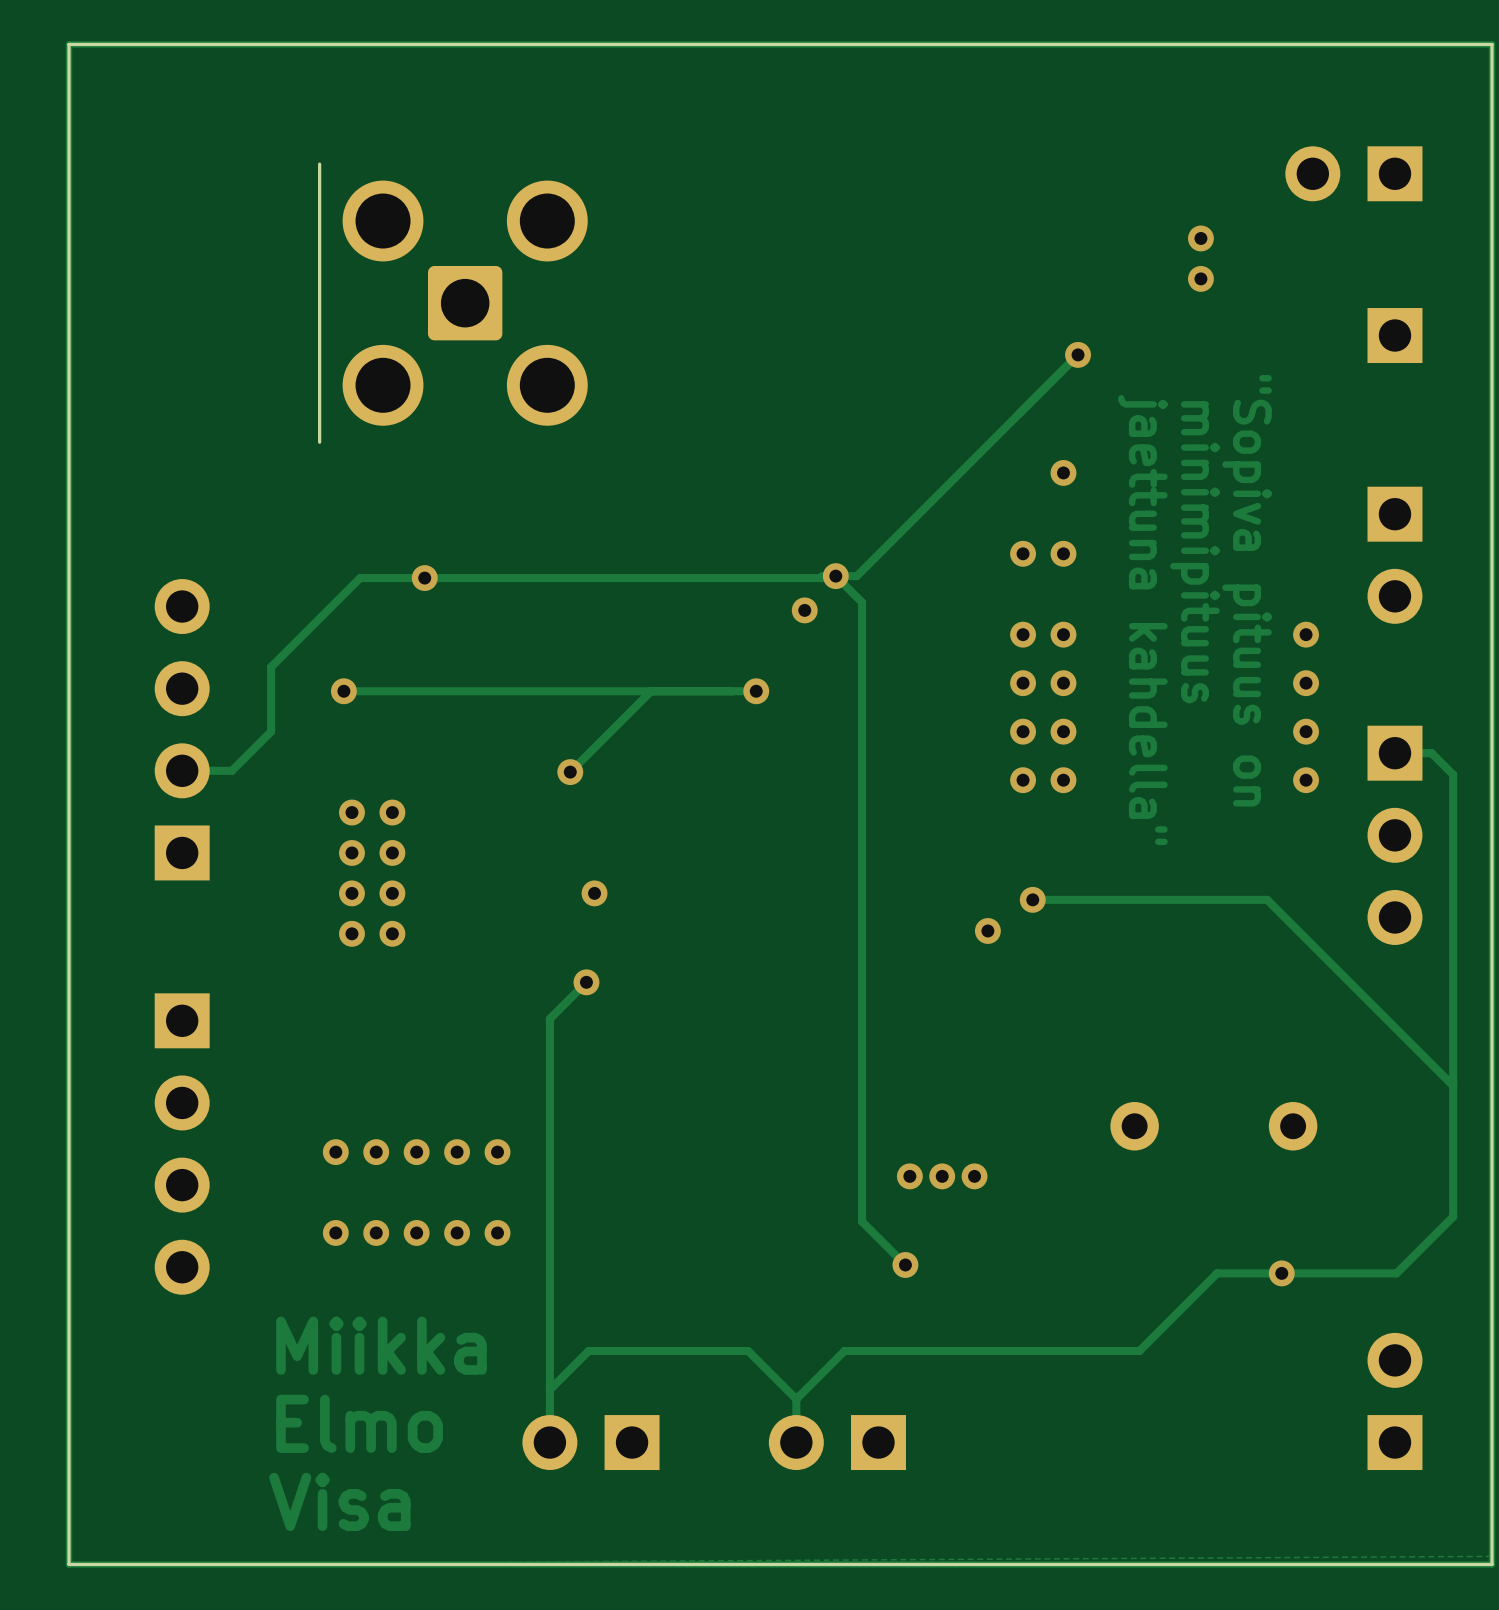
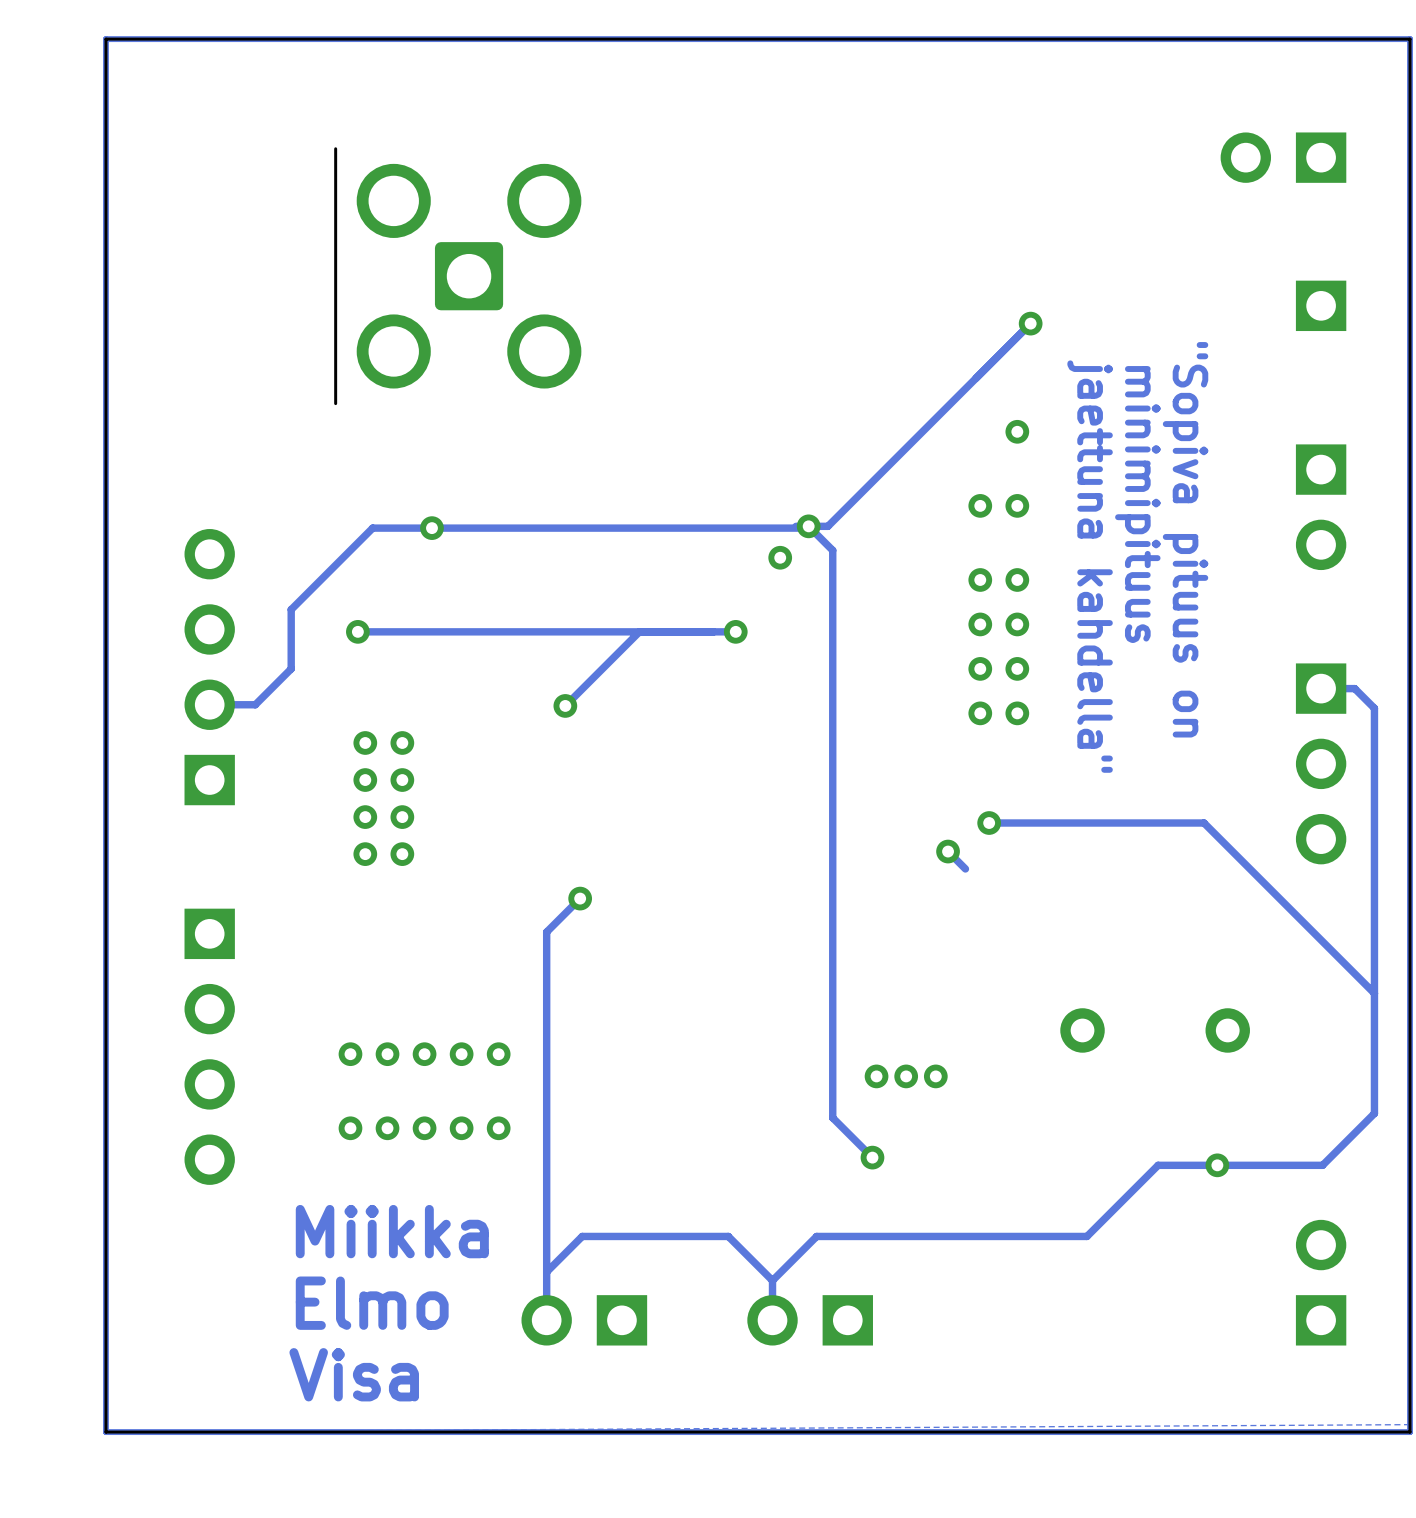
via: (1200, 238) -> none
via: (1200, 278) -> none
via: (1306, 634) -> none
via: (1306, 683) -> none
via: (1306, 731) -> none
via: (1306, 780) -> none
via: (594, 893) -> none
track: none -> (948, 851) (965, 868)

